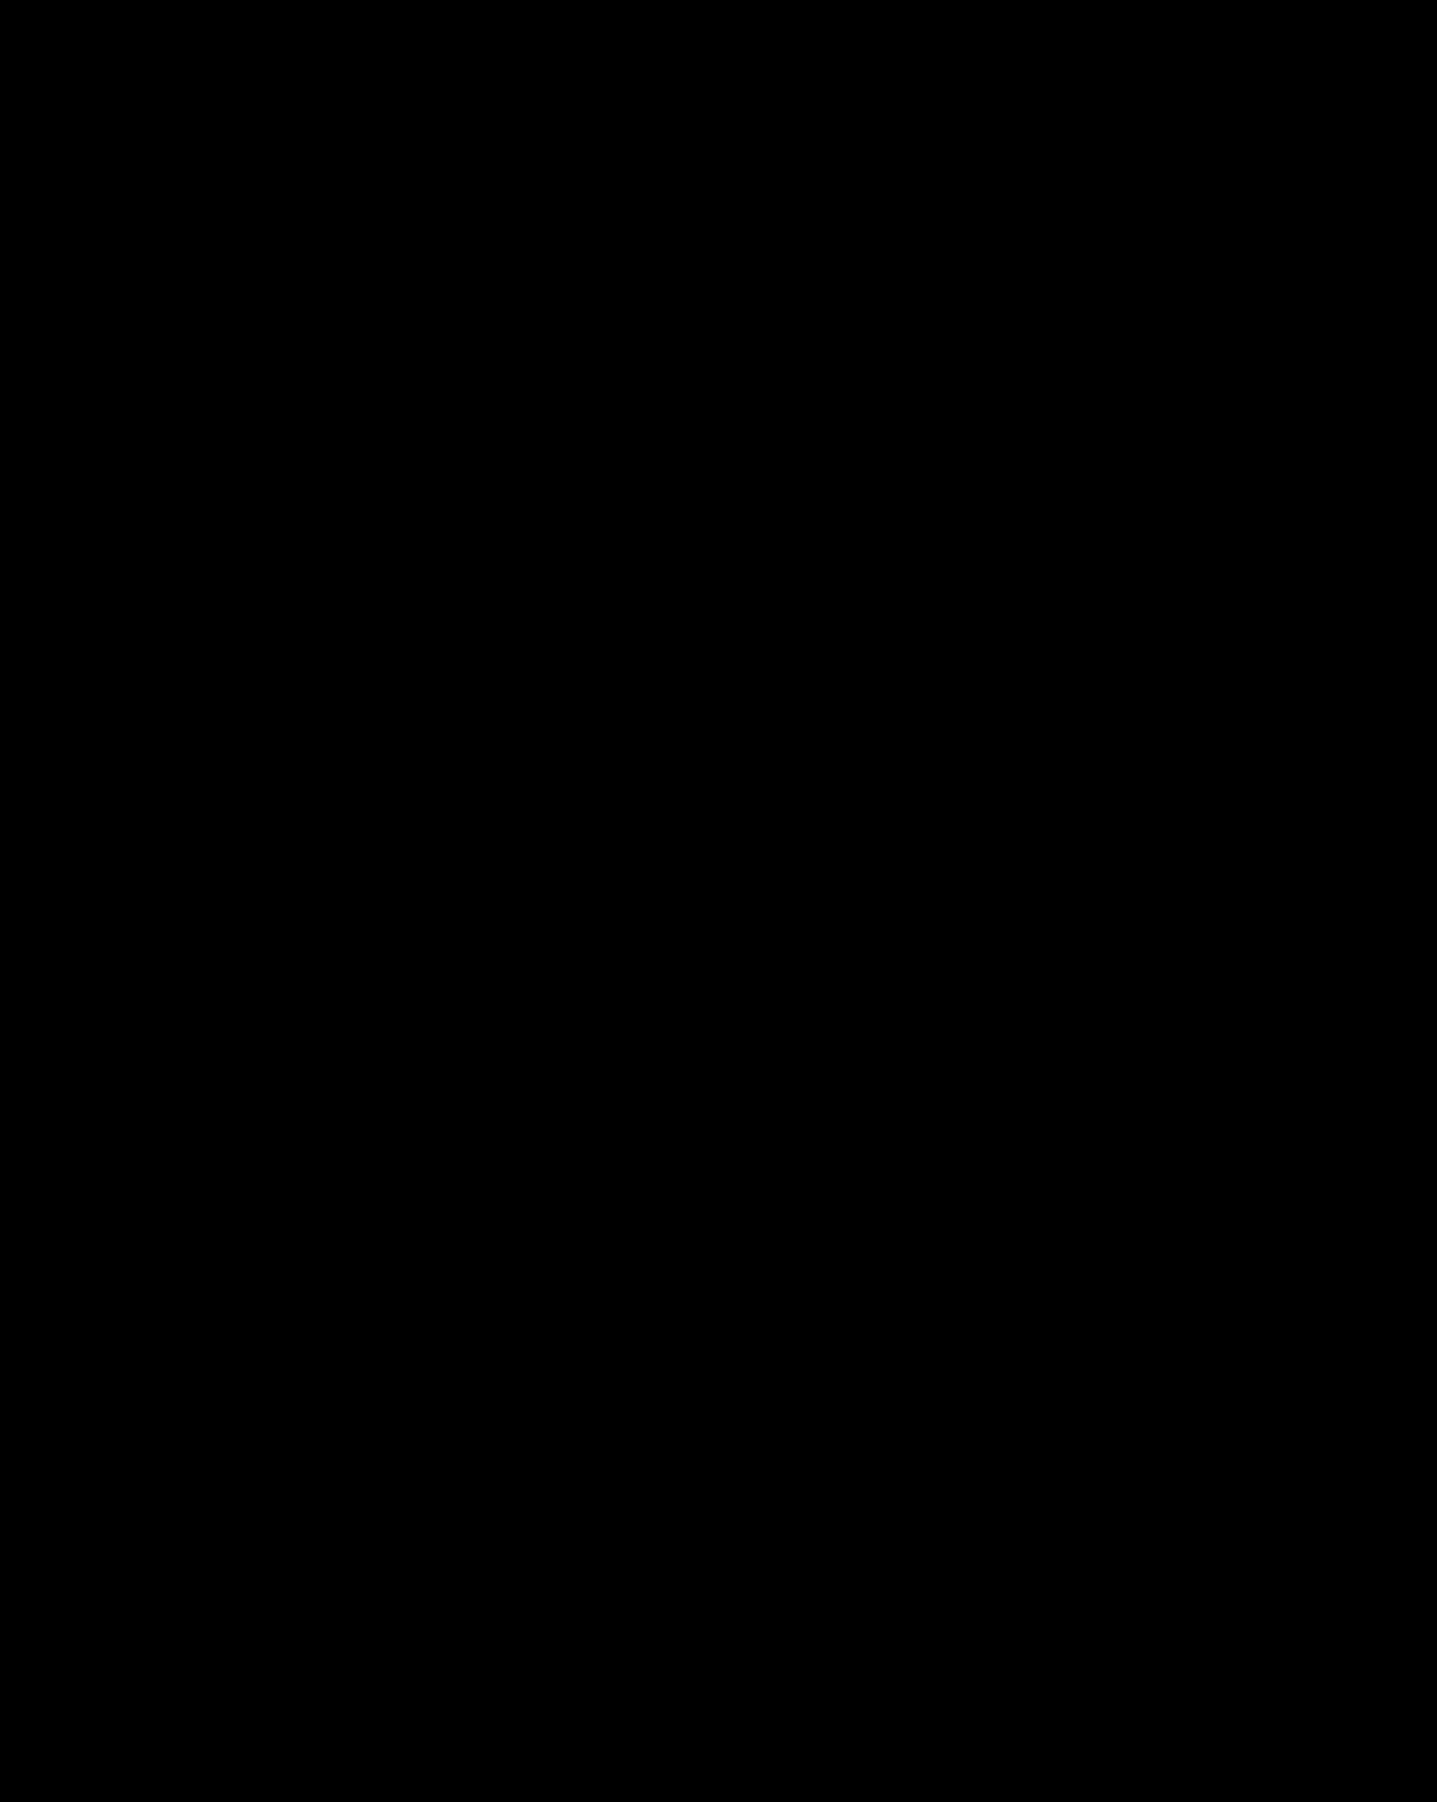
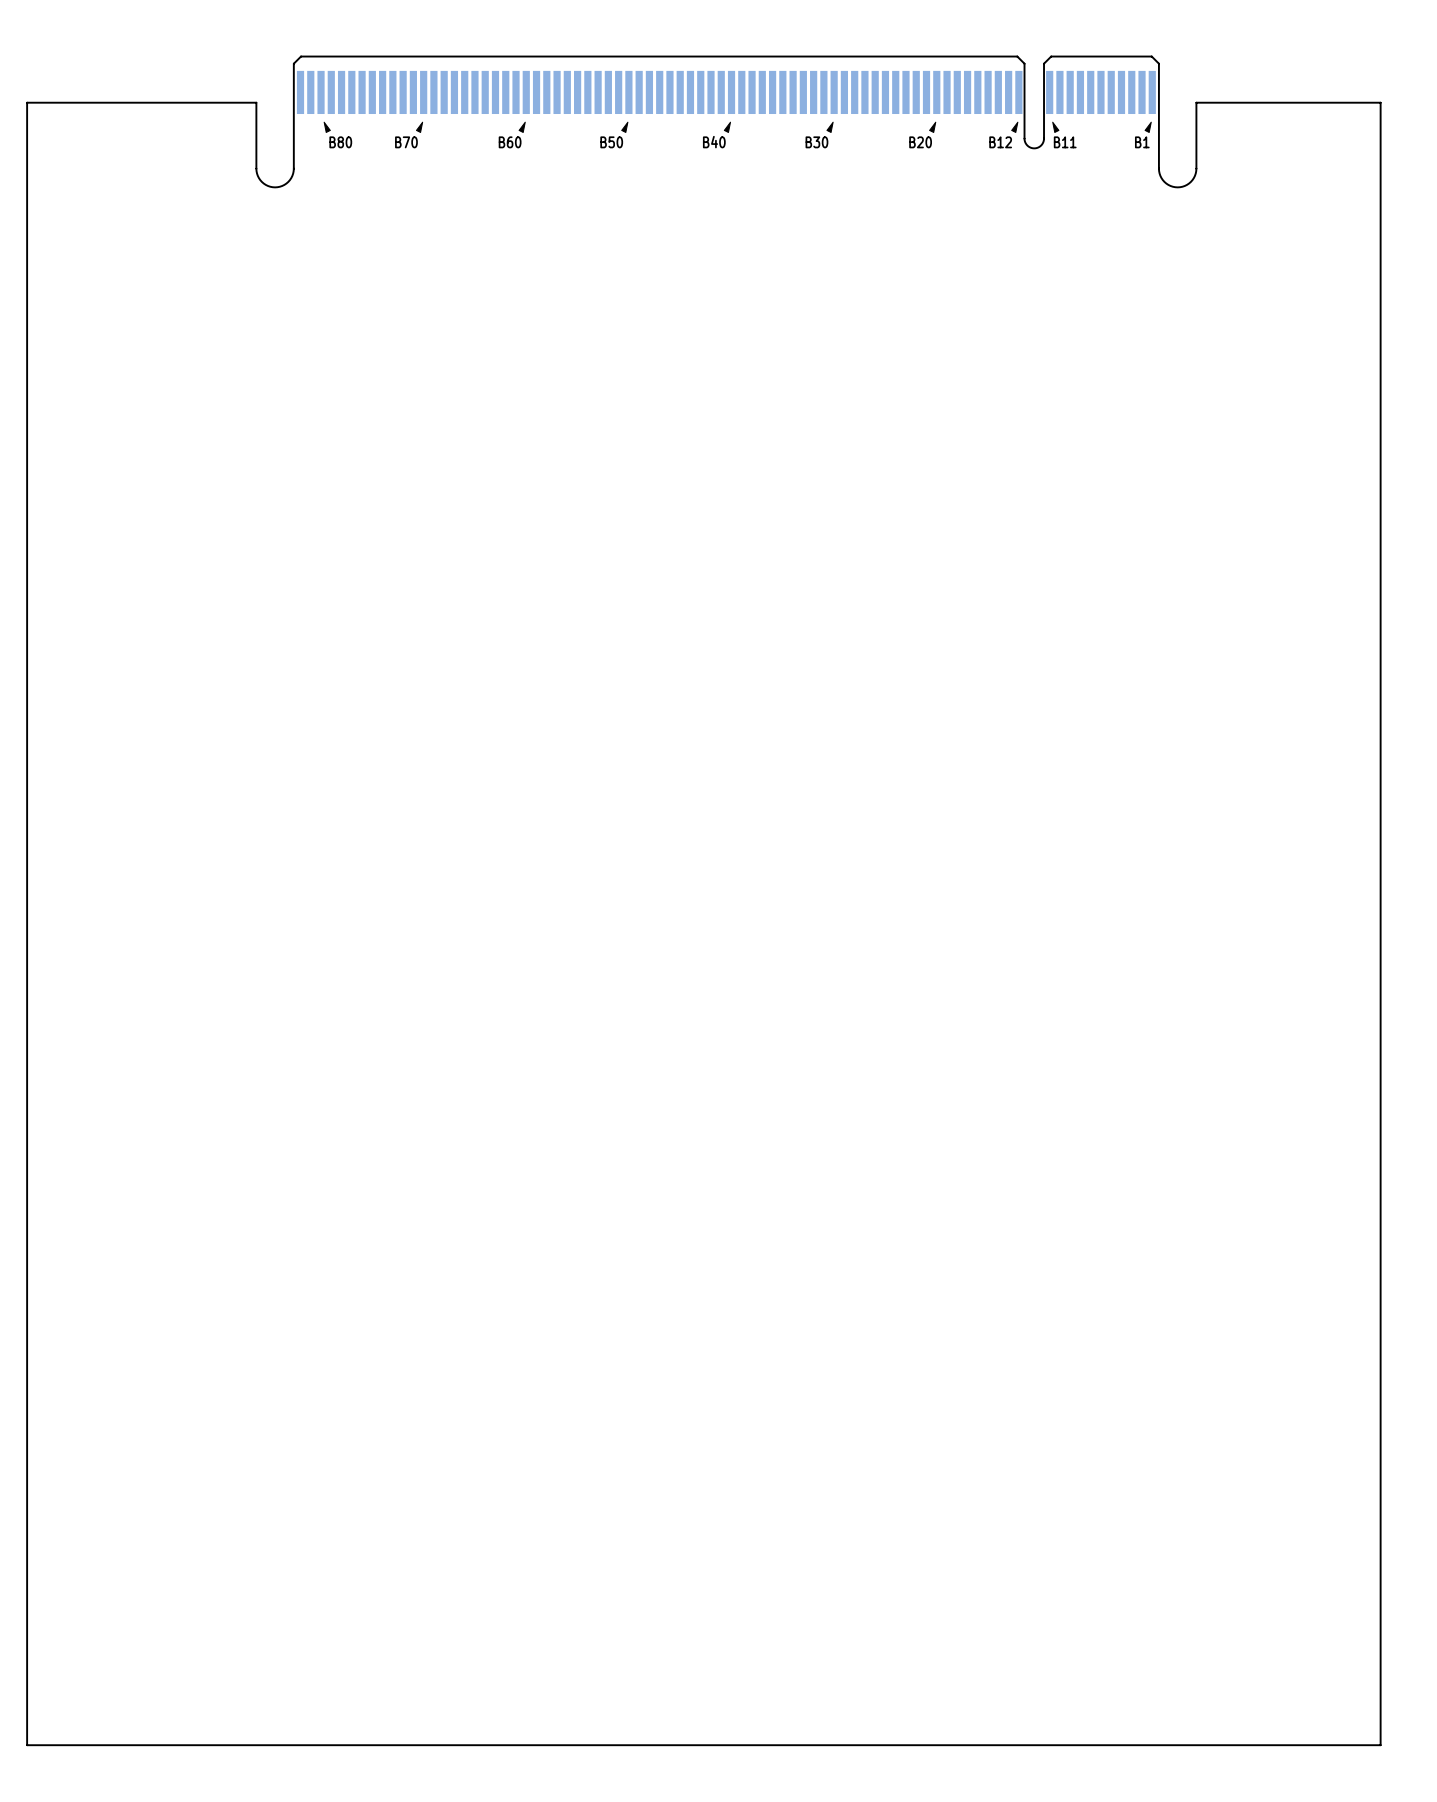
part: none -> (703, 900)

